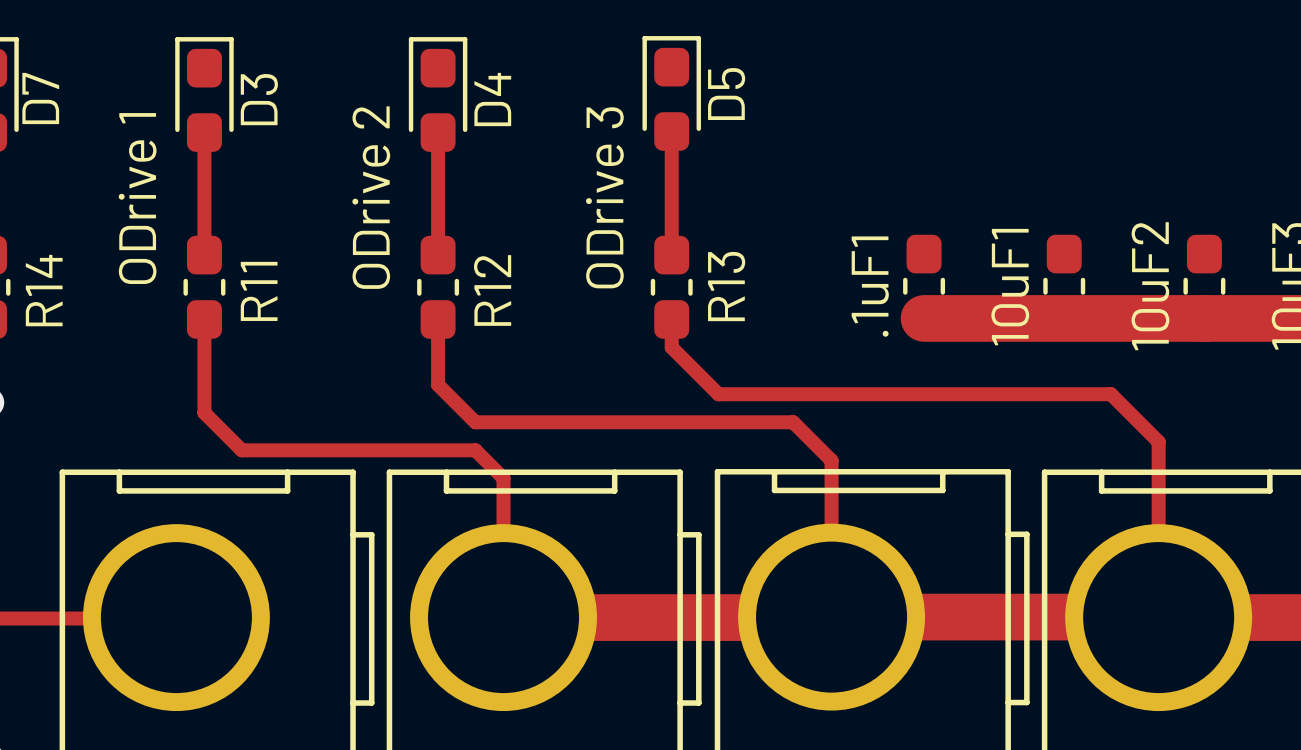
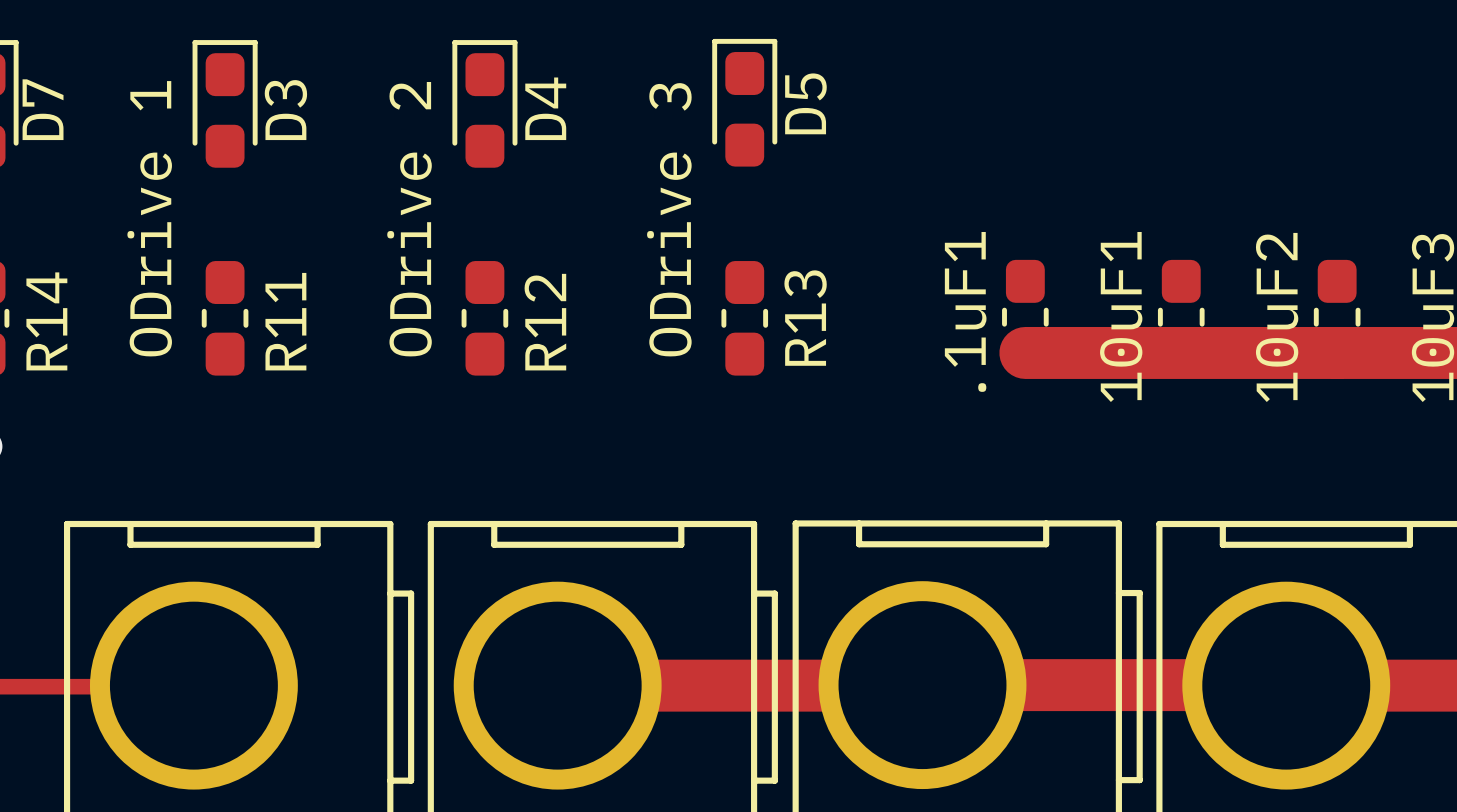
top track: (671, 131) (671, 255) -> none
top track: (204, 132) (204, 255) -> none
top track: (438, 132) (438, 255) -> none
top track: (204, 319) (204, 412) (241, 450) (475, 450) (503, 478) (503, 617) -> none
top track: (438, 319) (438, 384) (475, 422) (793, 422) (831, 460) (831, 617) -> none
top track: (671, 319) (671, 347) (718, 394) (1110, 394) (1158, 441) (1158, 617) -> none

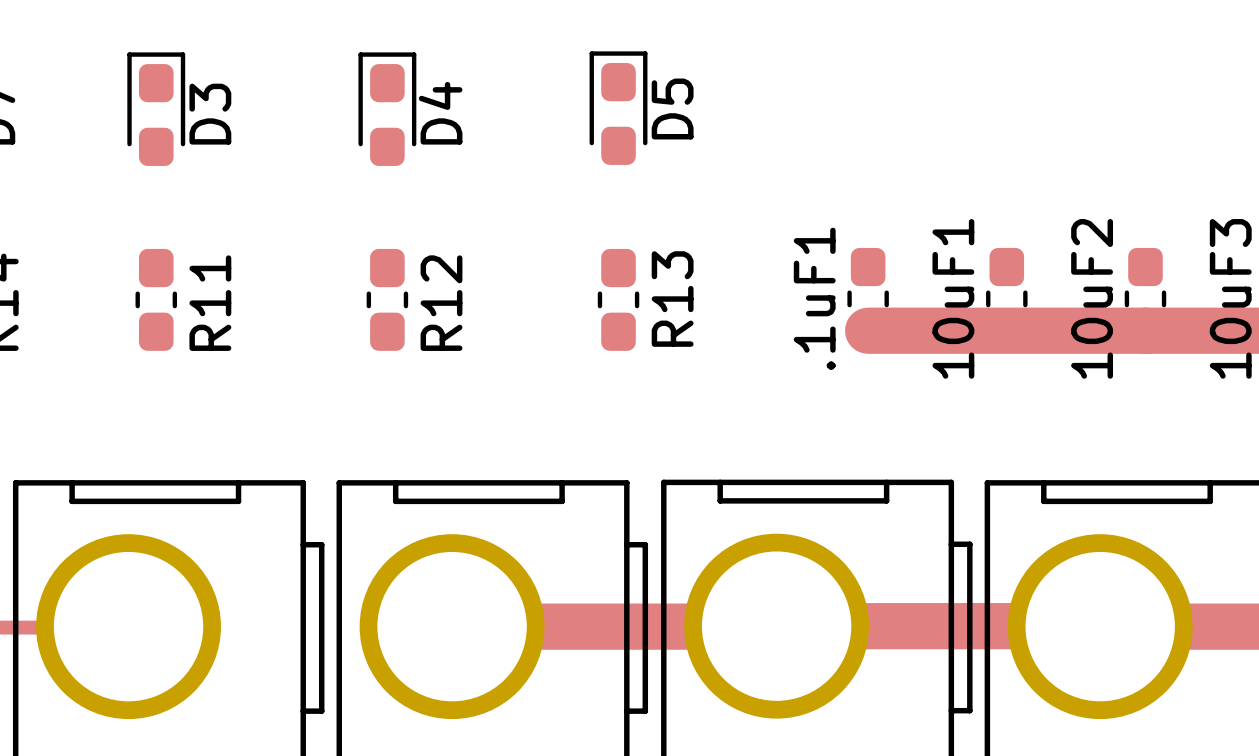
text: ODrive 1 (149, 218) -> none
text: ODrive 2 (409, 219) -> none
text: ODrive 3 (669, 219) -> none

